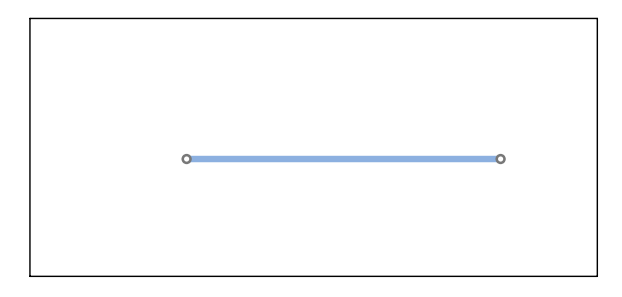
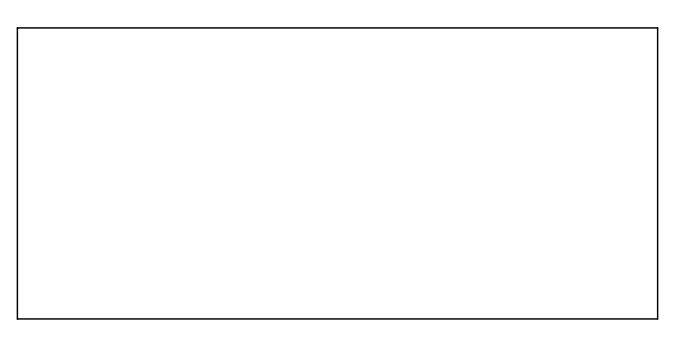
via: (186, 159) -> none
track: (500, 159) (186, 159) -> none
via: (500, 159) -> none

